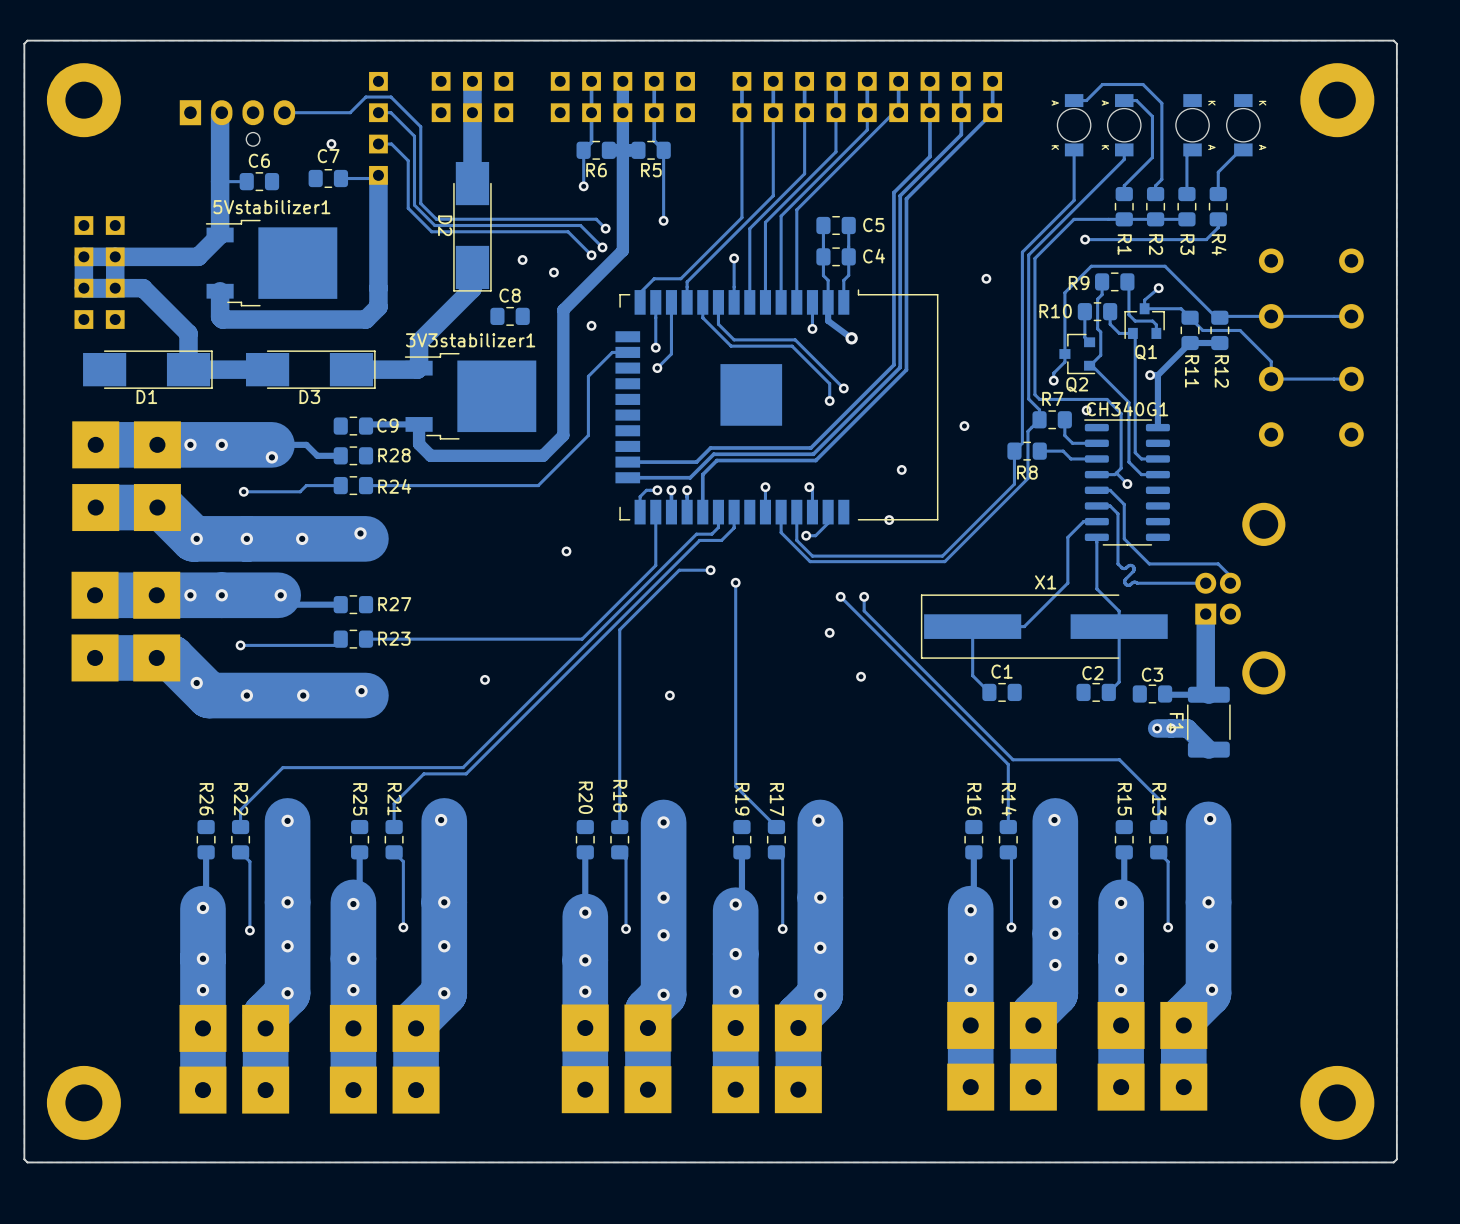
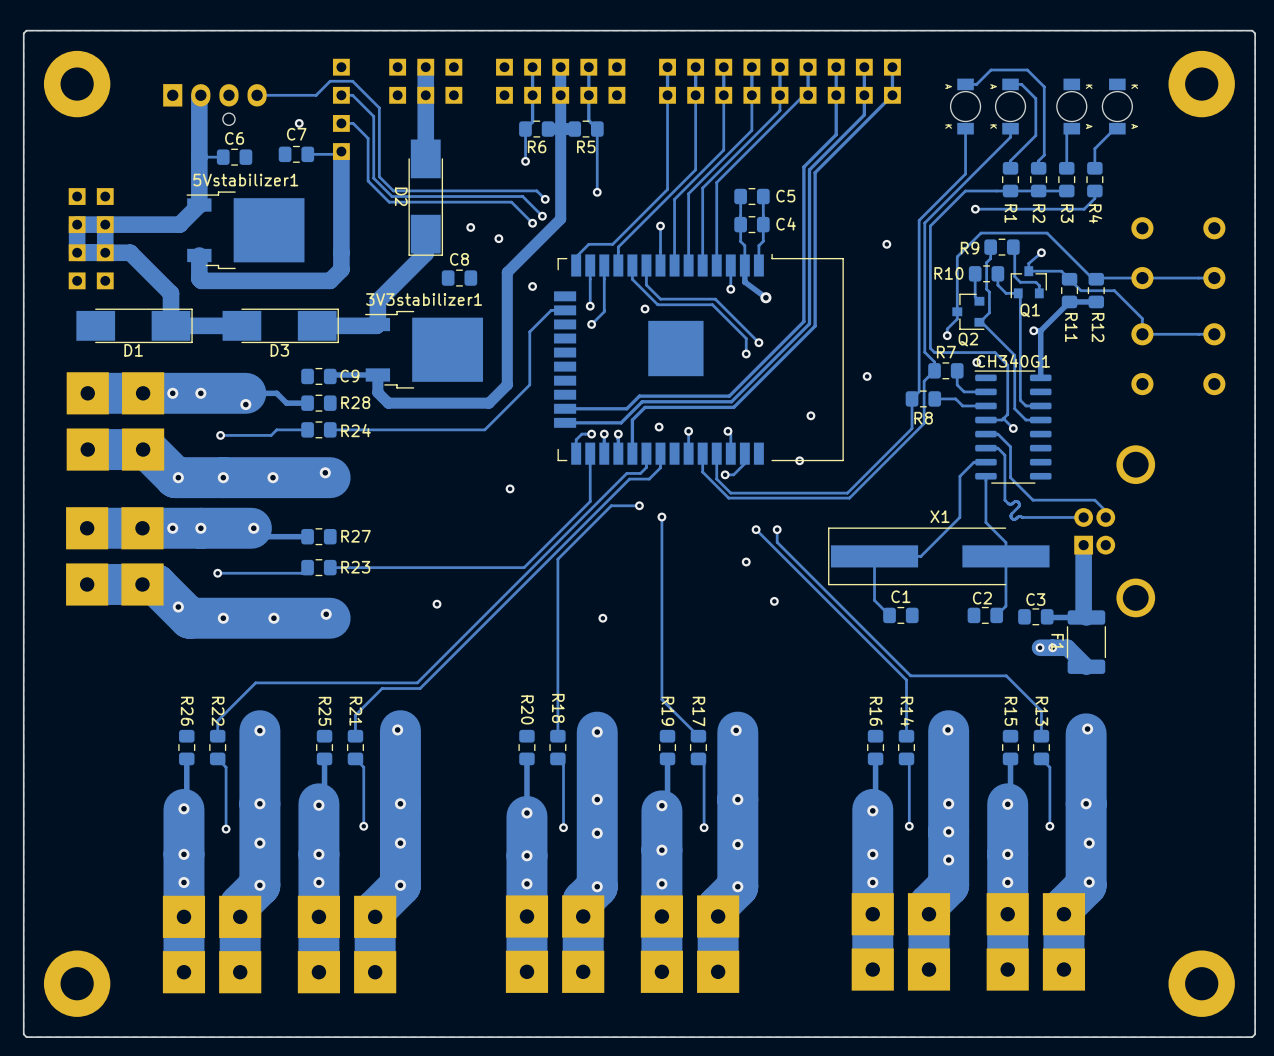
via: none -> (645, 308)
via: none -> (659, 427)

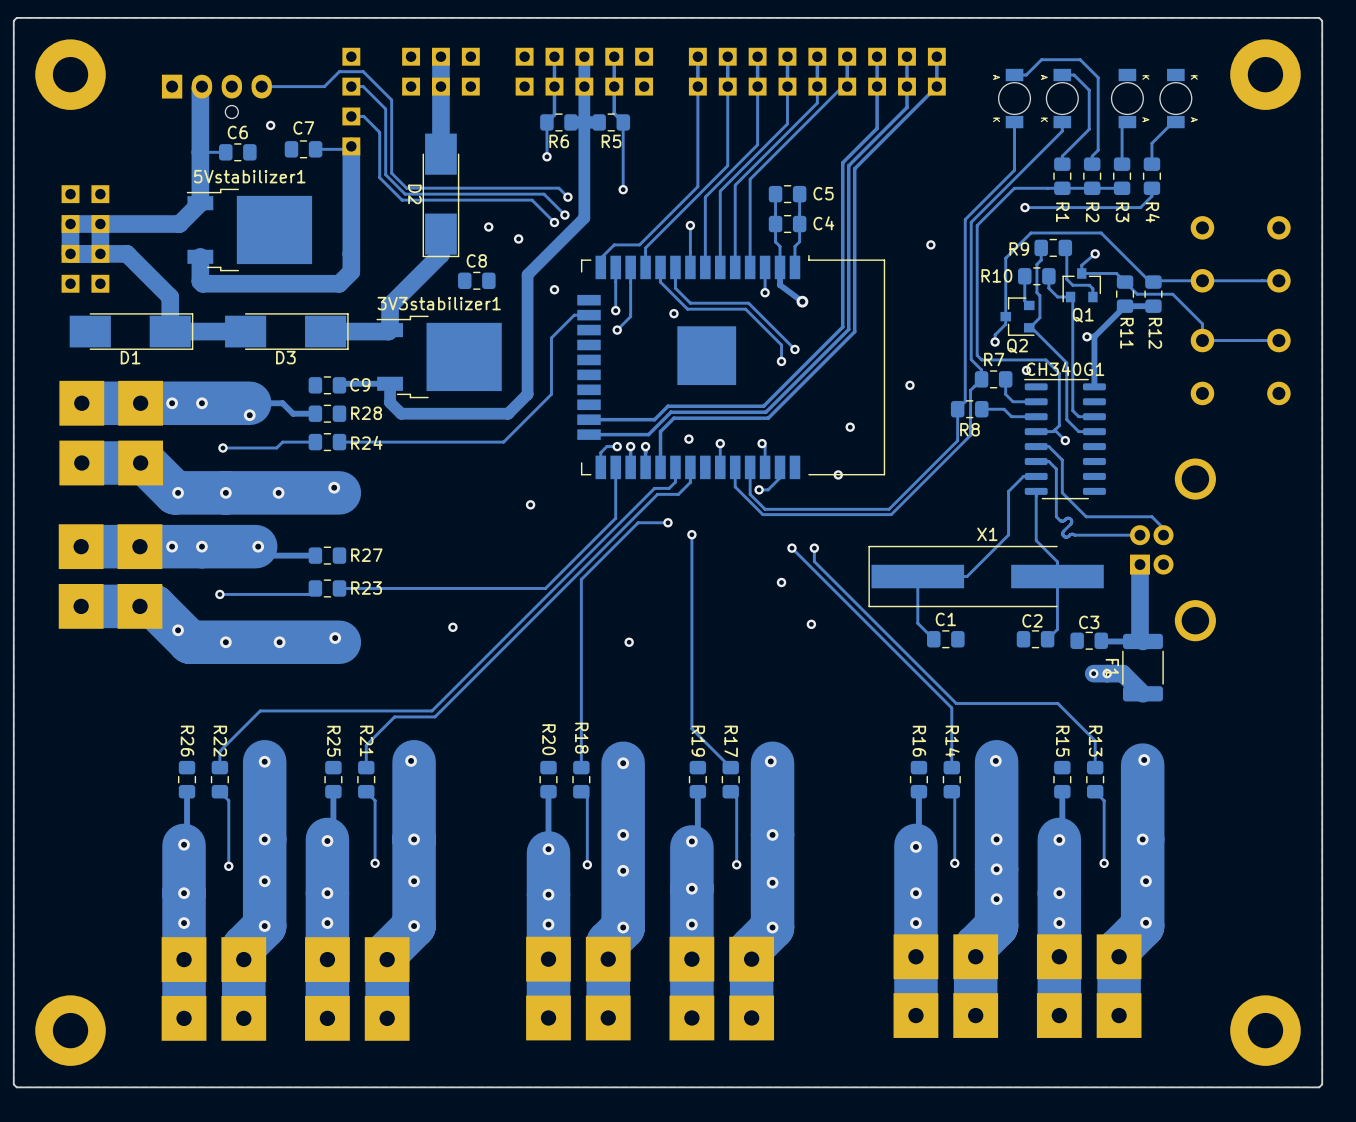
via position: (299, 123) -> (270, 125)

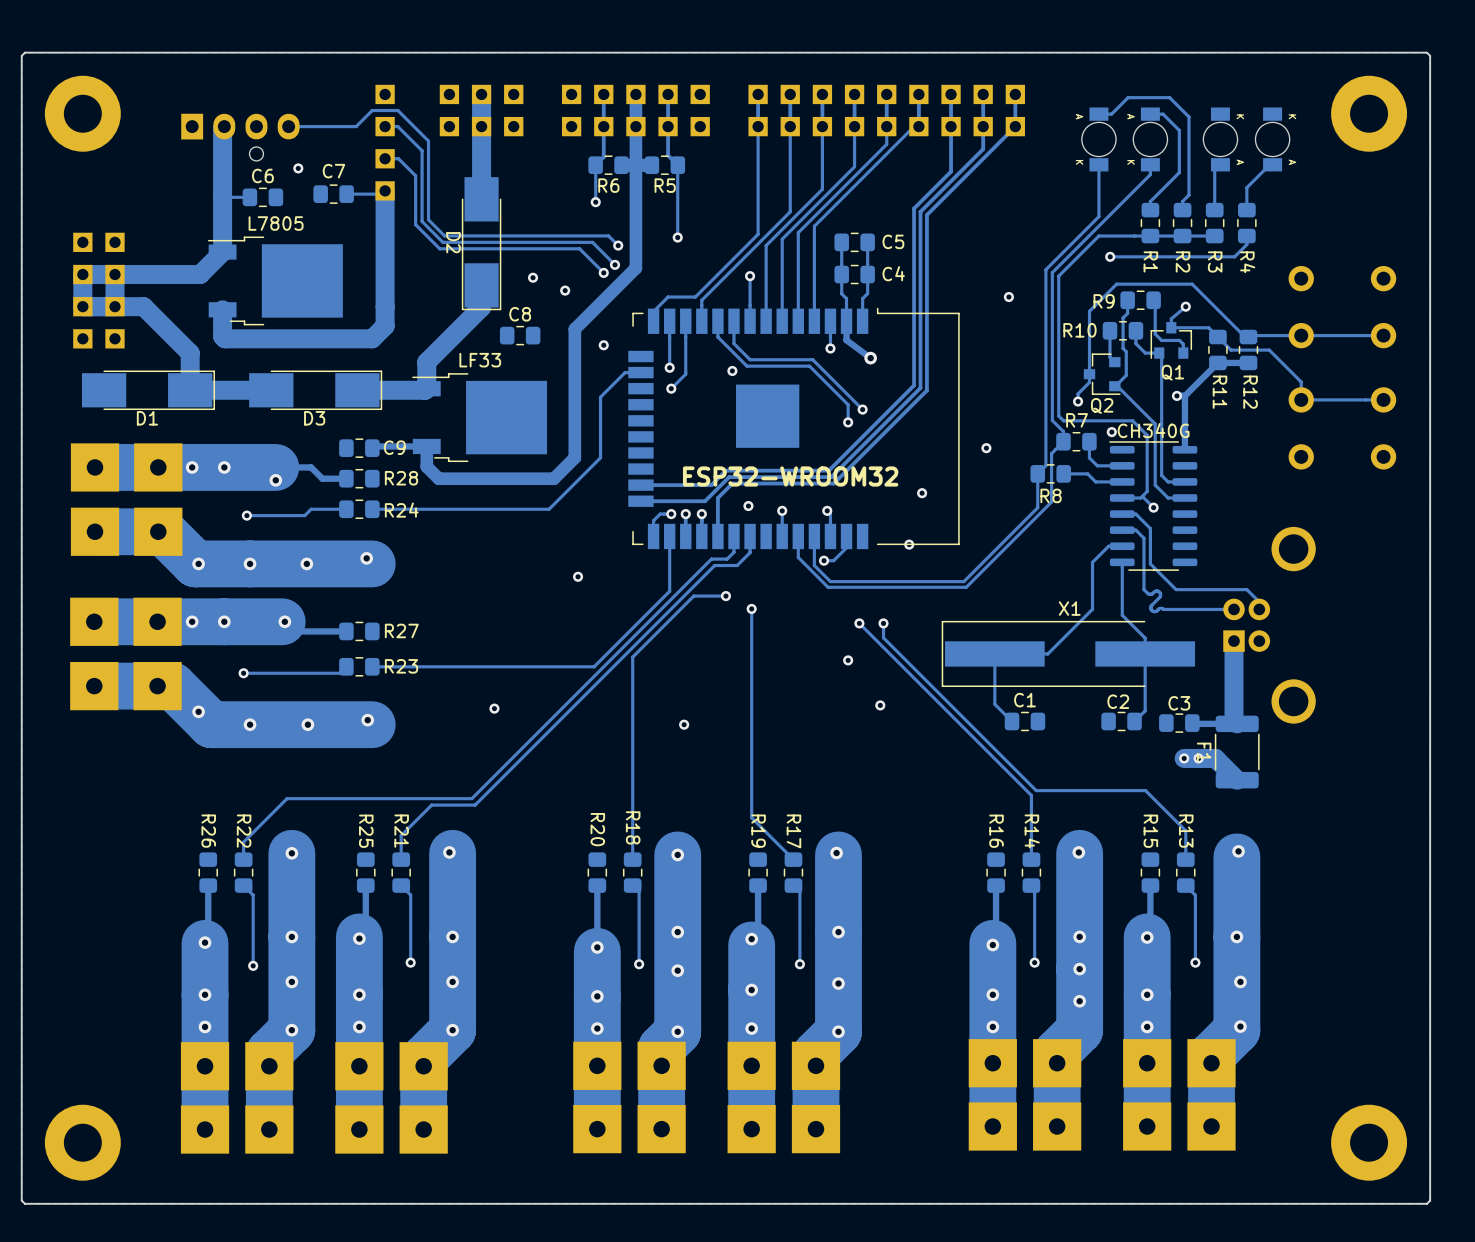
5Vstabilizer1 name: 5Vstabilizer1 (249, 176) -> L7805 (276, 223)
3V3stabilizer1 name: 3V3stabilizer1 (439, 303) -> LF33 (480, 360)
CH340G1 name: CH340G1 (1065, 369) -> CH340G (1153, 430)
text: none -> ESP32-WROOM32 (790, 476)

